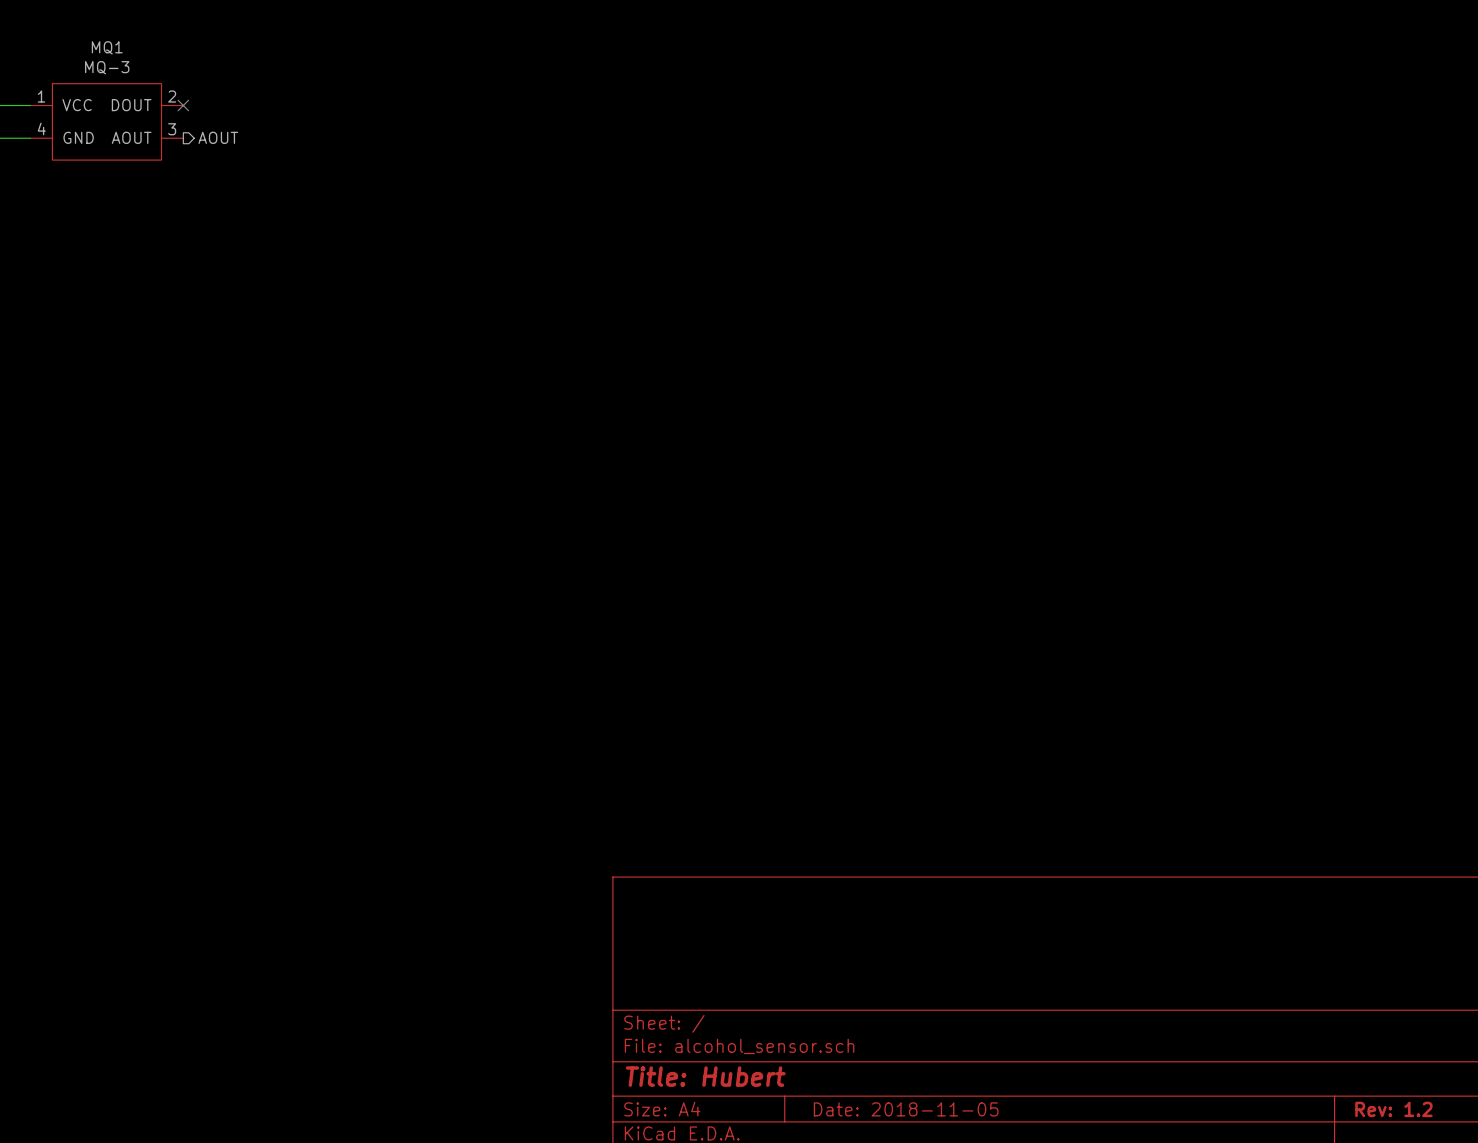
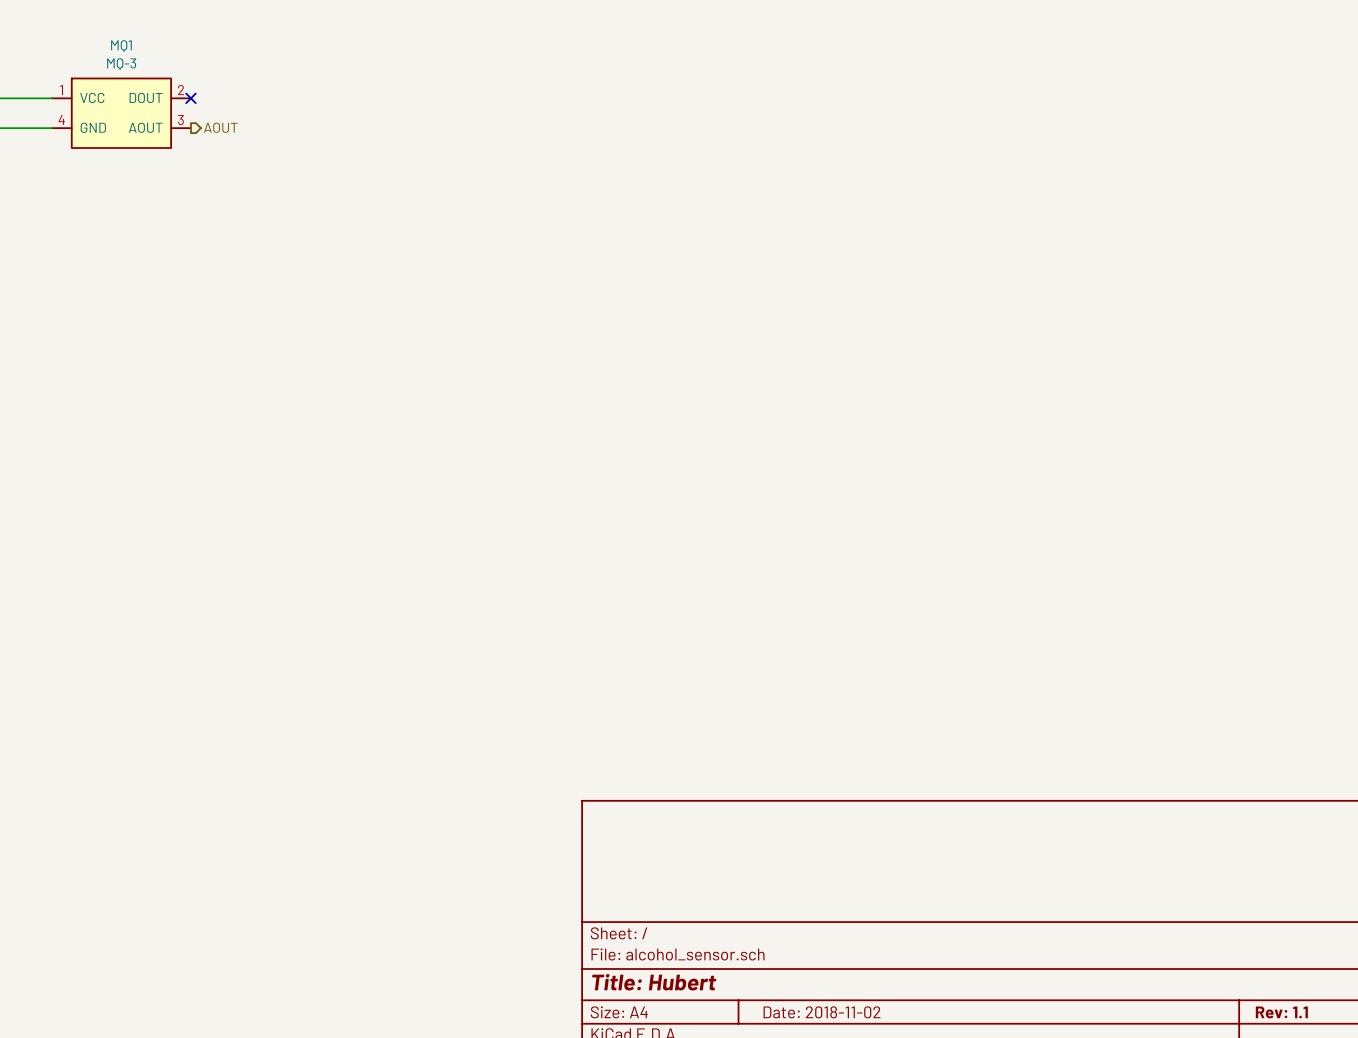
title block: Date: 2018-11-05 (906, 1109) -> Date: 2018-11-02 (822, 1012)
title block: Rev: 1.2 (1393, 1109) -> Rev: 1.1 (1281, 1012)

